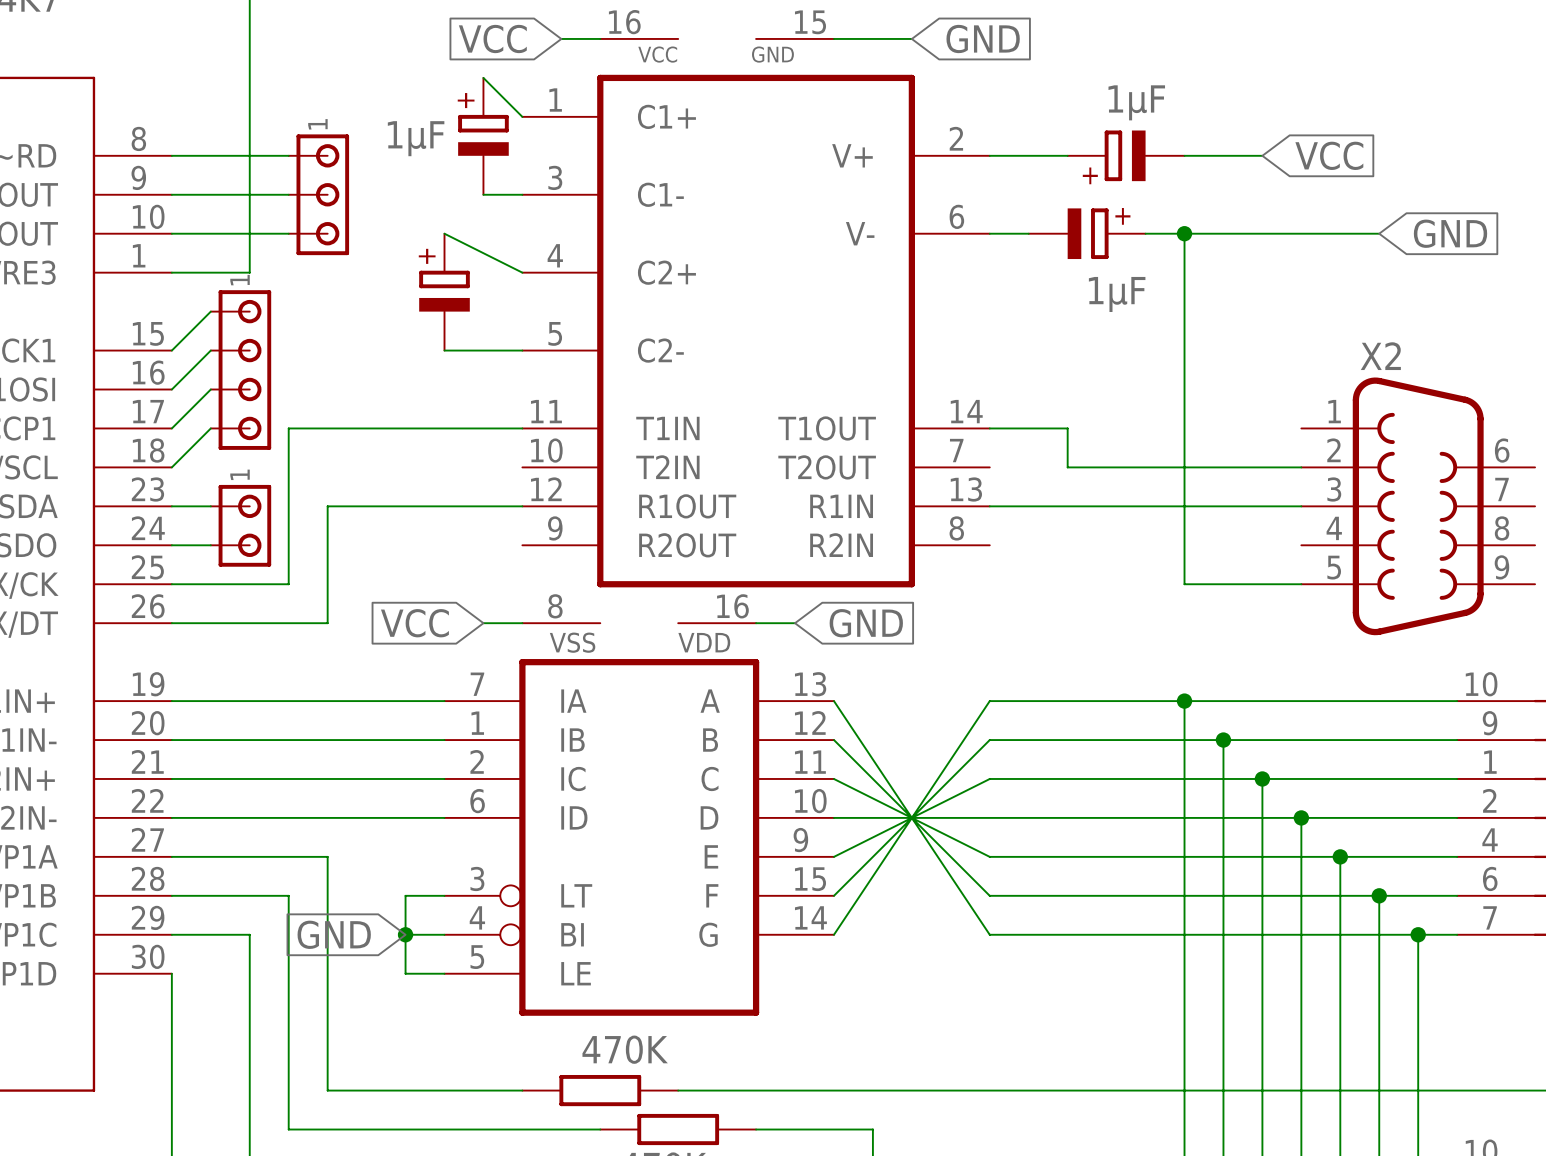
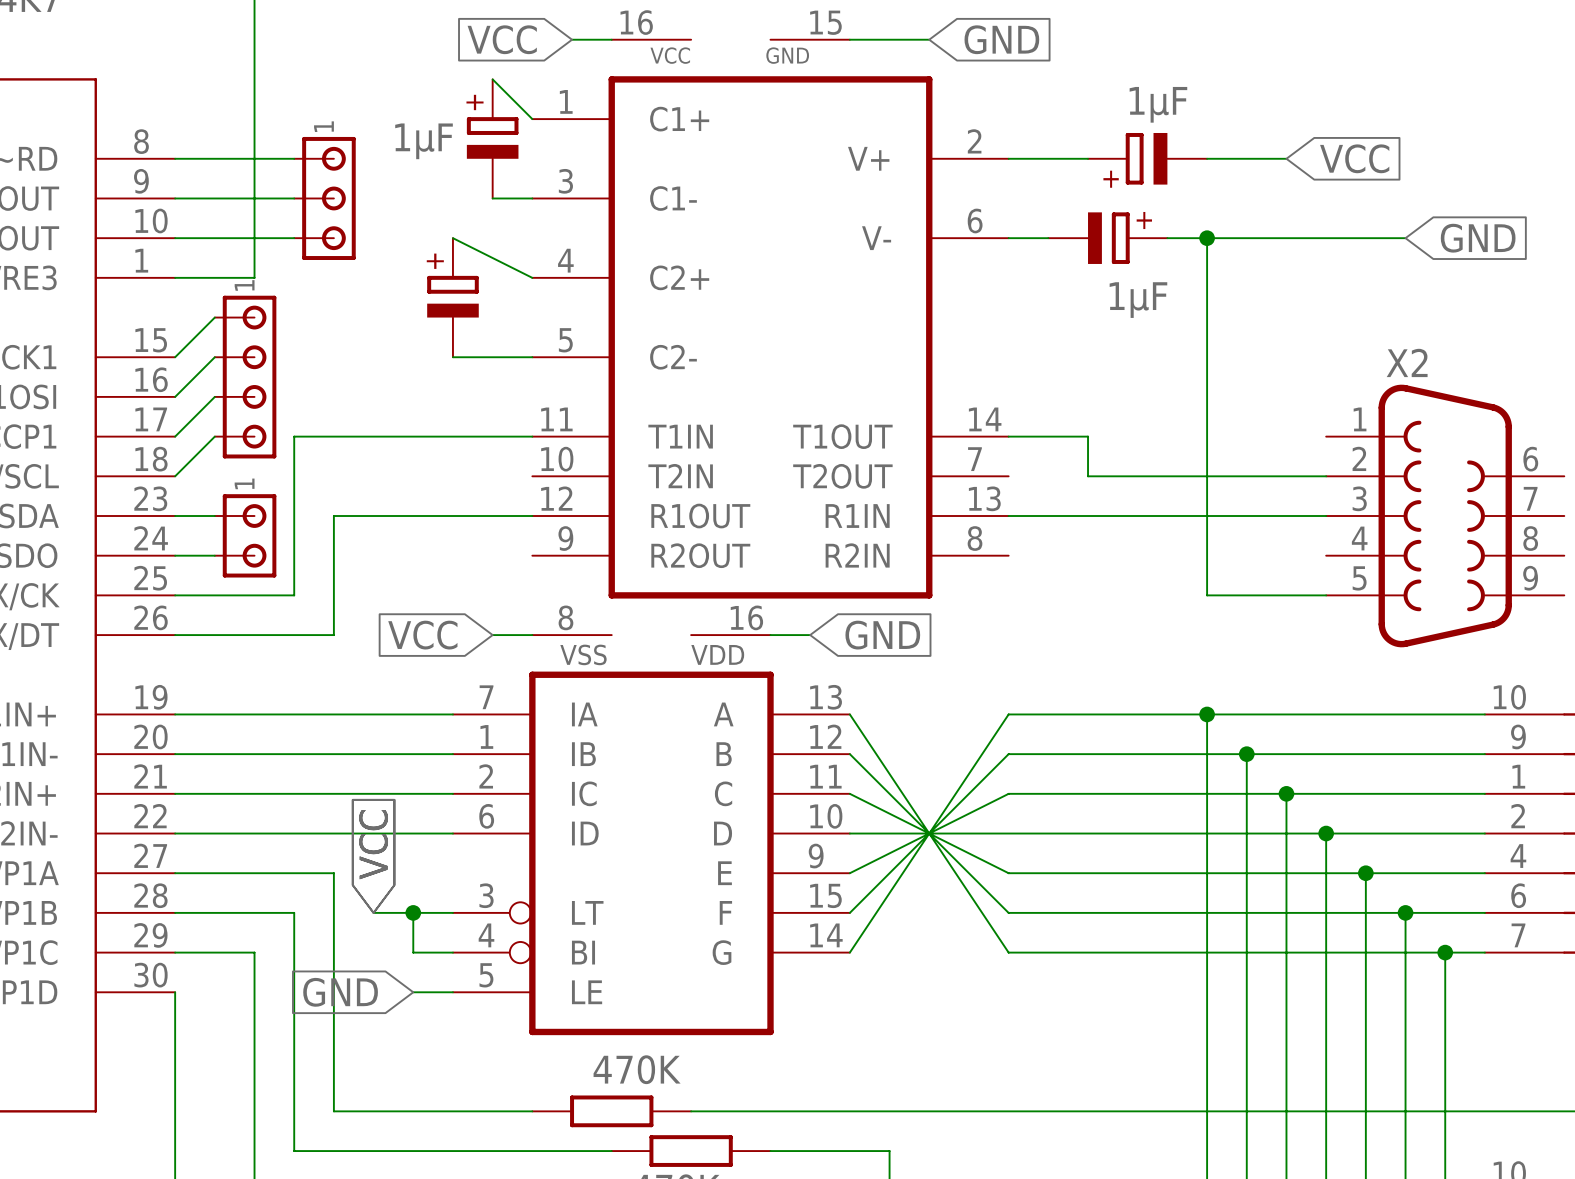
global label: none -> VCC (373, 844)
wire: none -> (373, 912) (413, 912)
global label position: GND (334, 934) -> GND (340, 992)
wire: (405, 934) (405, 973) -> none
junction position: (405, 934) -> (413, 912)

